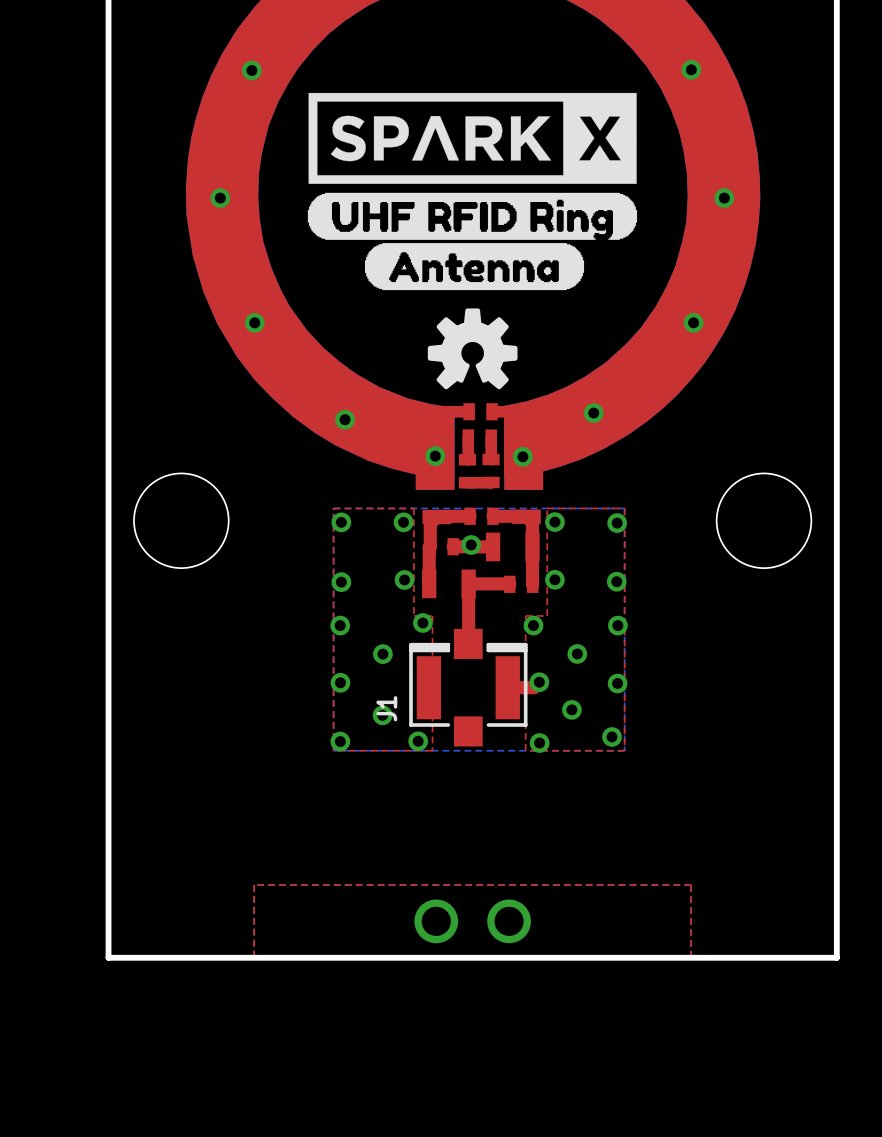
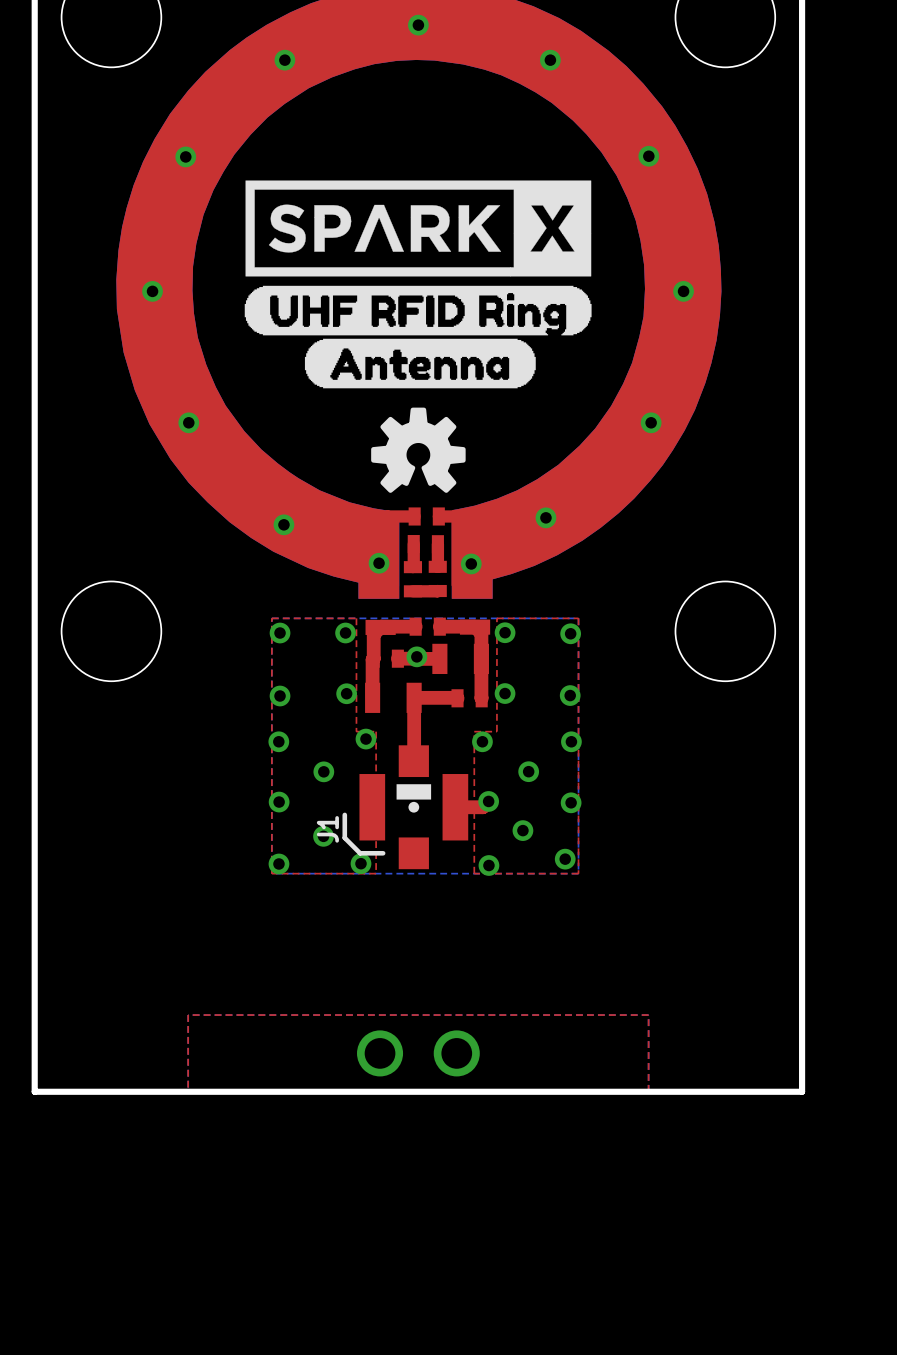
J1 footprint: [409, 628, 528, 747] -> [342, 745, 469, 870]

